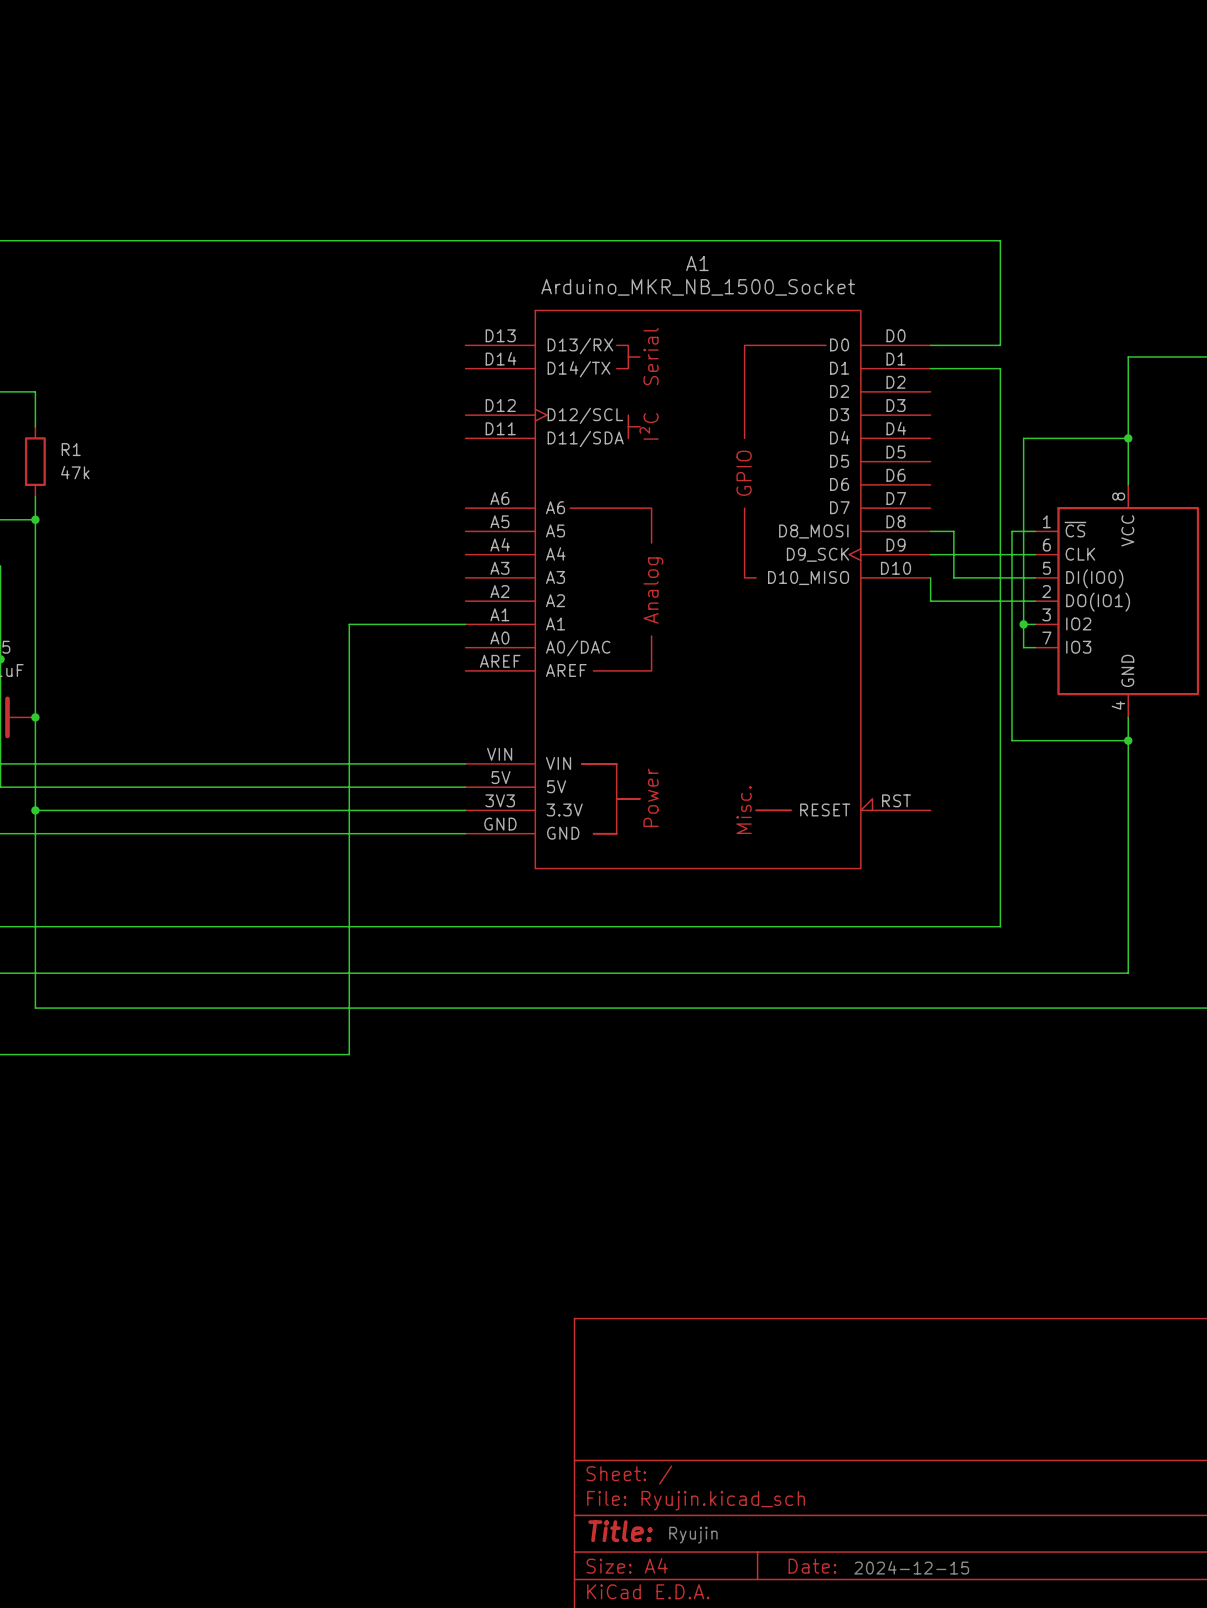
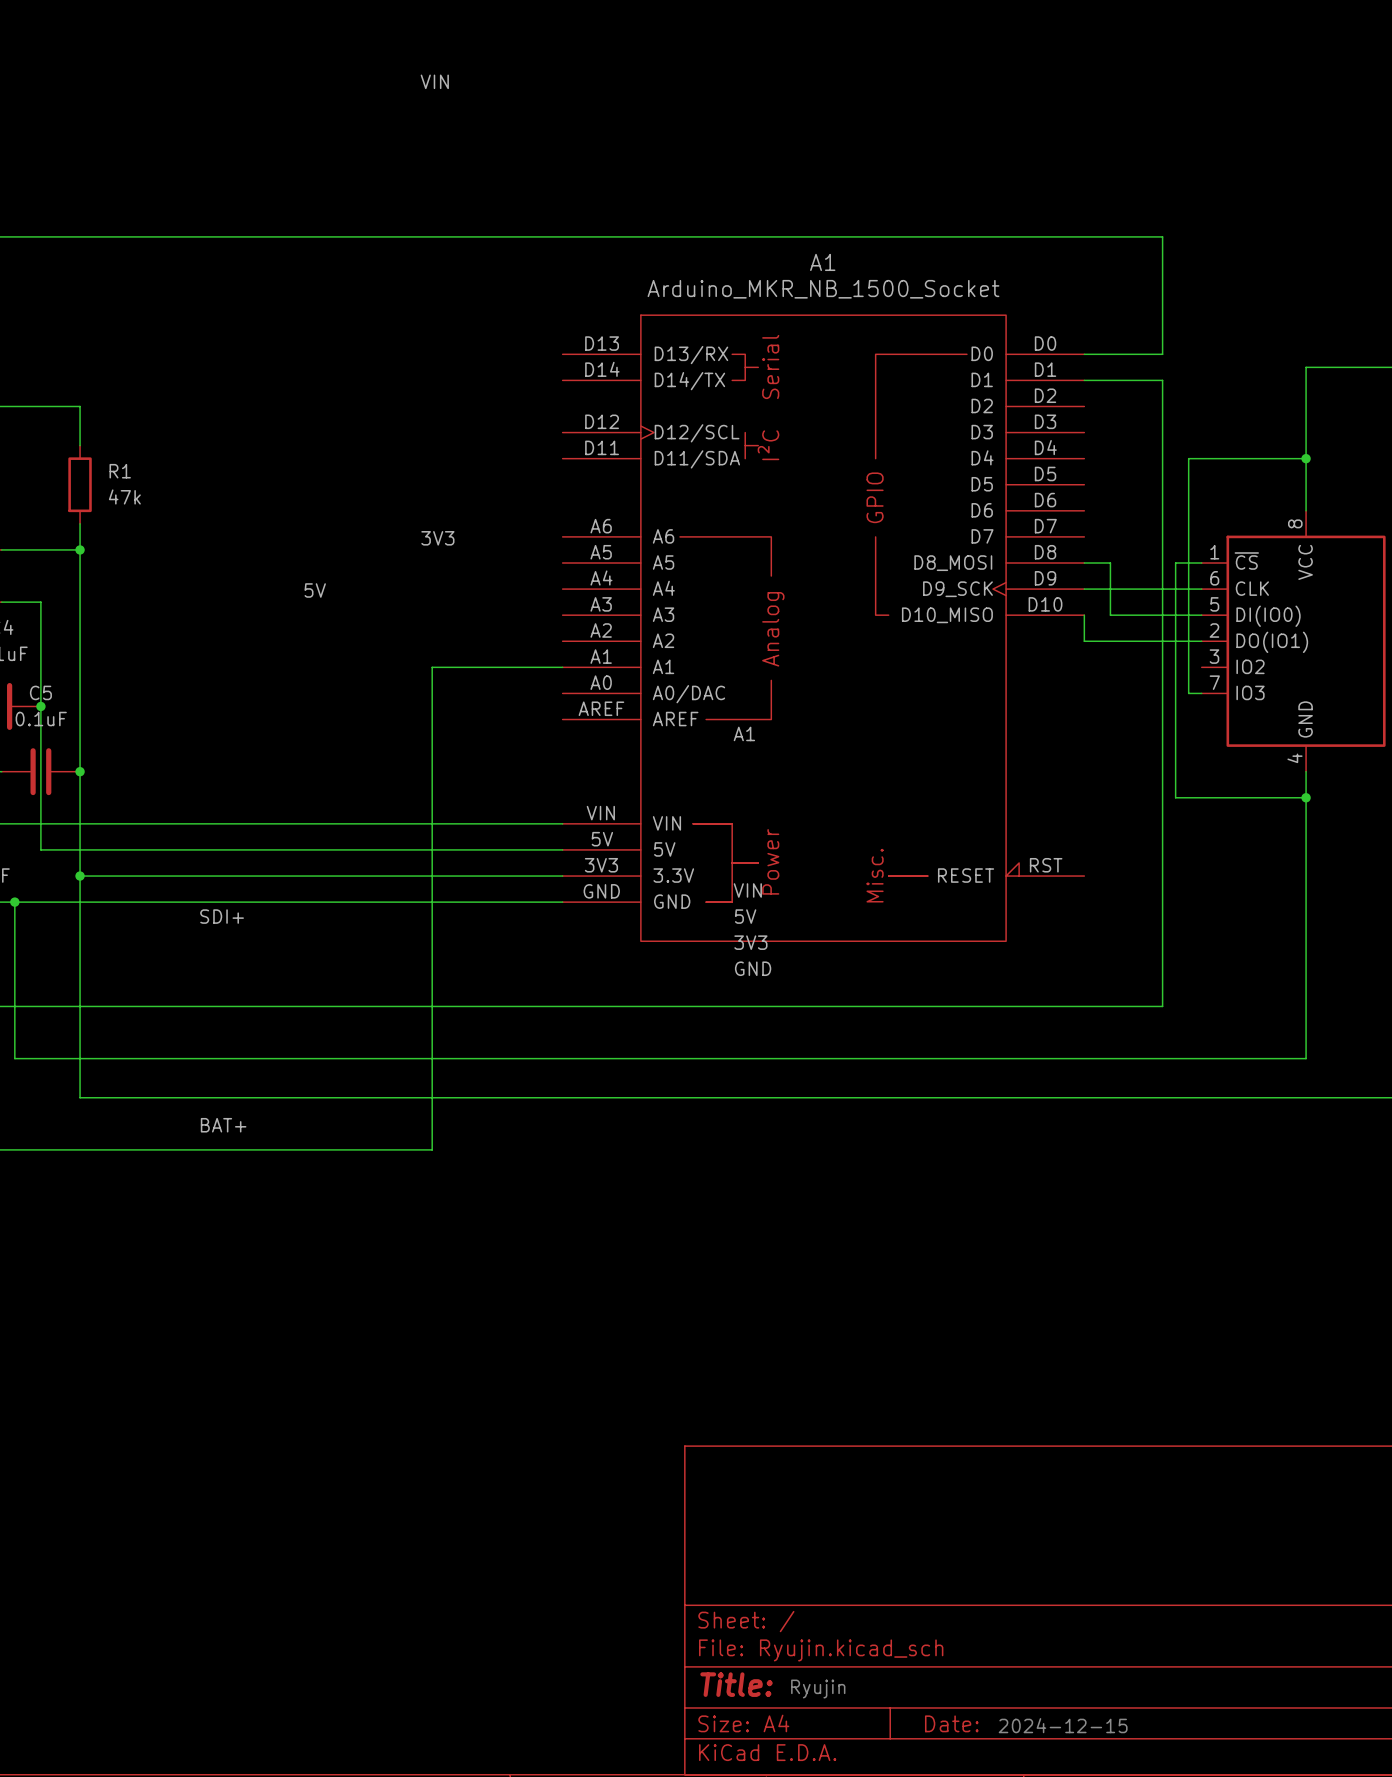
label: none -> VIN (434, 81)
label: none -> 3V3 (437, 538)
label: none -> 5V (315, 590)
wire: (1023, 624) (1035, 624) -> none
junction: (1023, 624) -> none
label: none -> A1 (744, 733)
label: none -> VIN (747, 890)
label: none -> SDI+ (222, 916)
label: none -> 5V (745, 916)
label: none -> 3V3 (750, 942)
label: none -> GND (753, 968)
label: none -> BAT+ (223, 1125)

